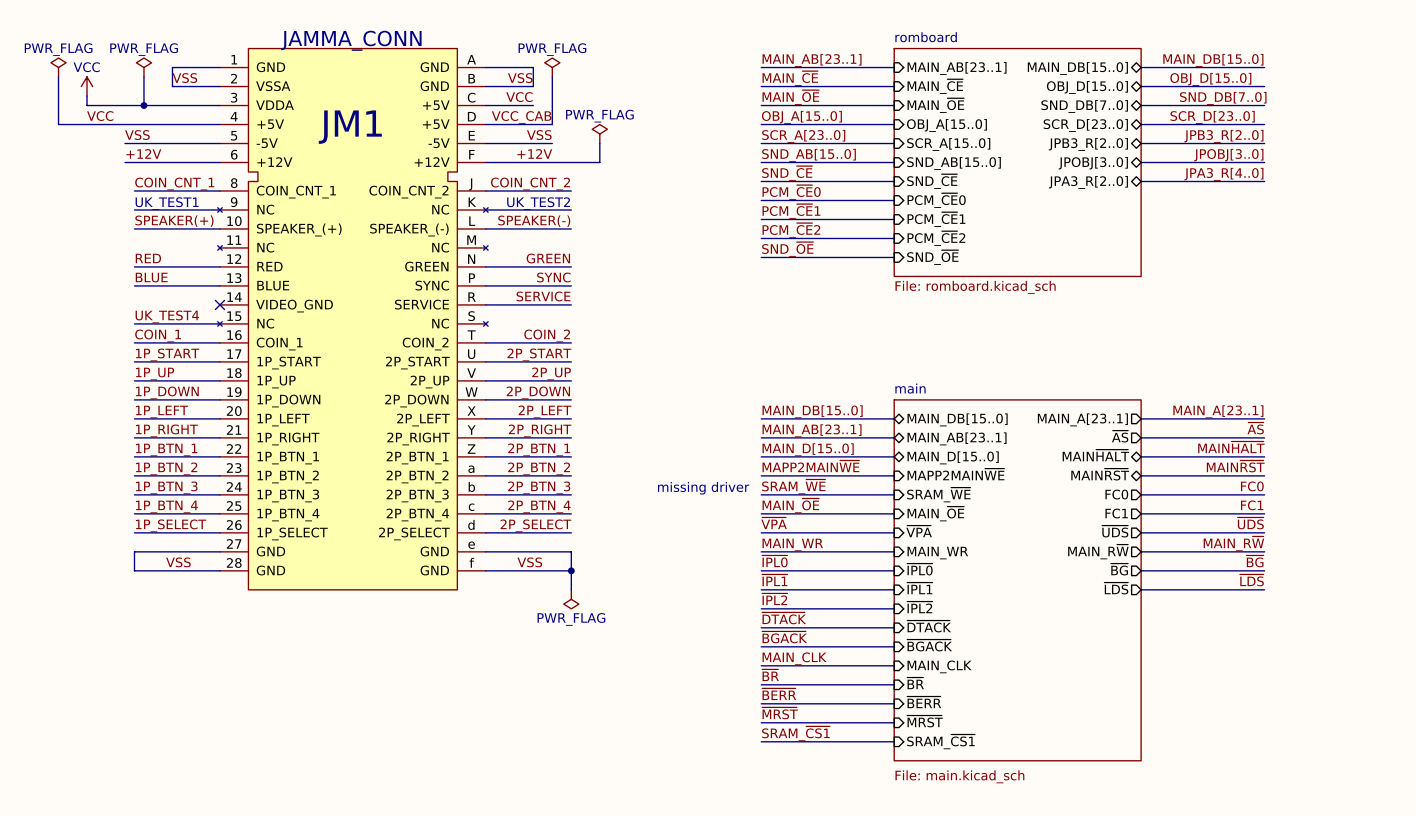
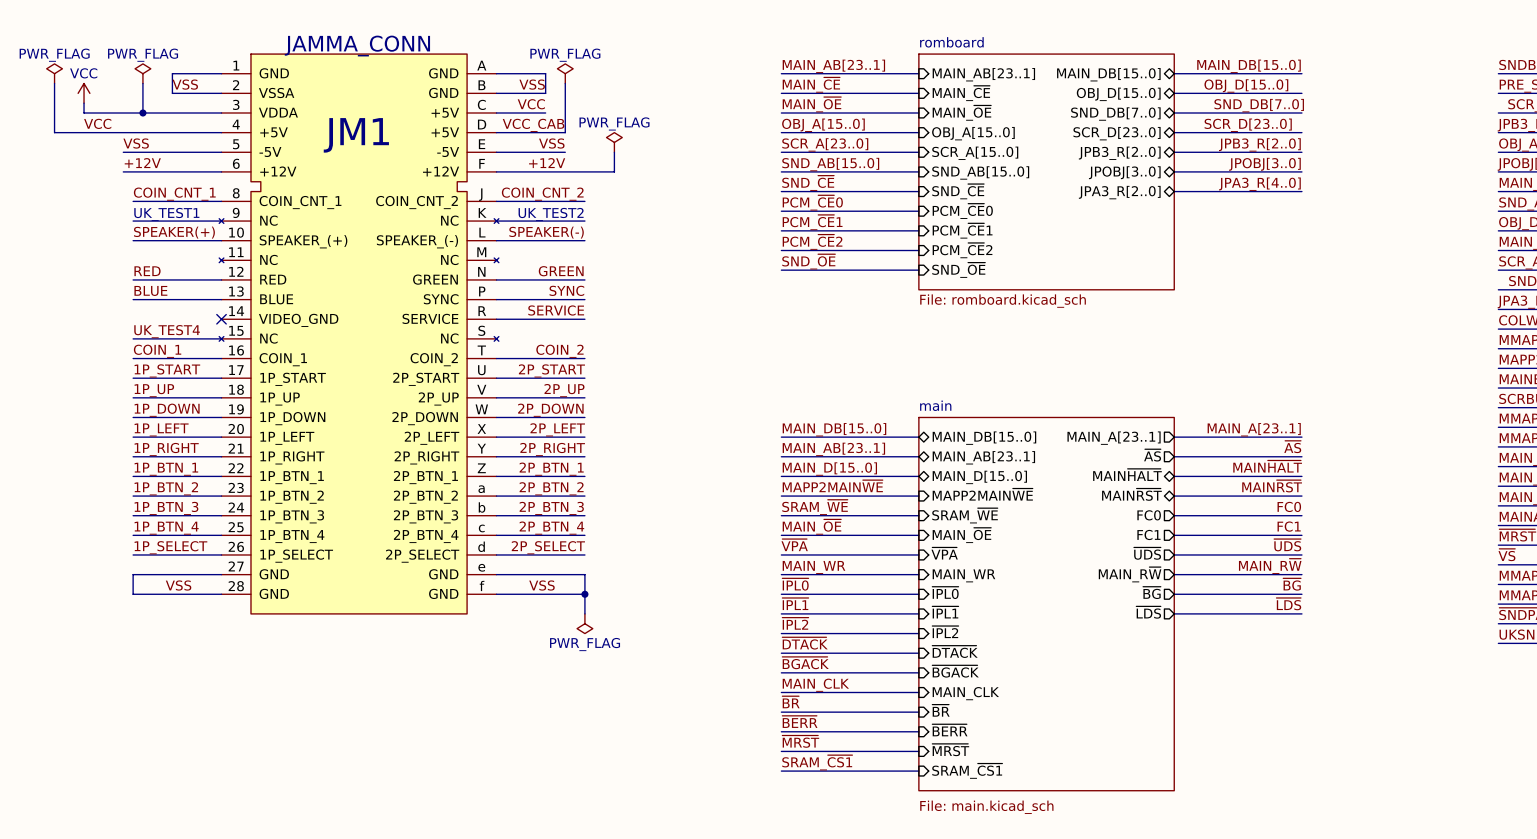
text: missing driver (703, 488) -> none

